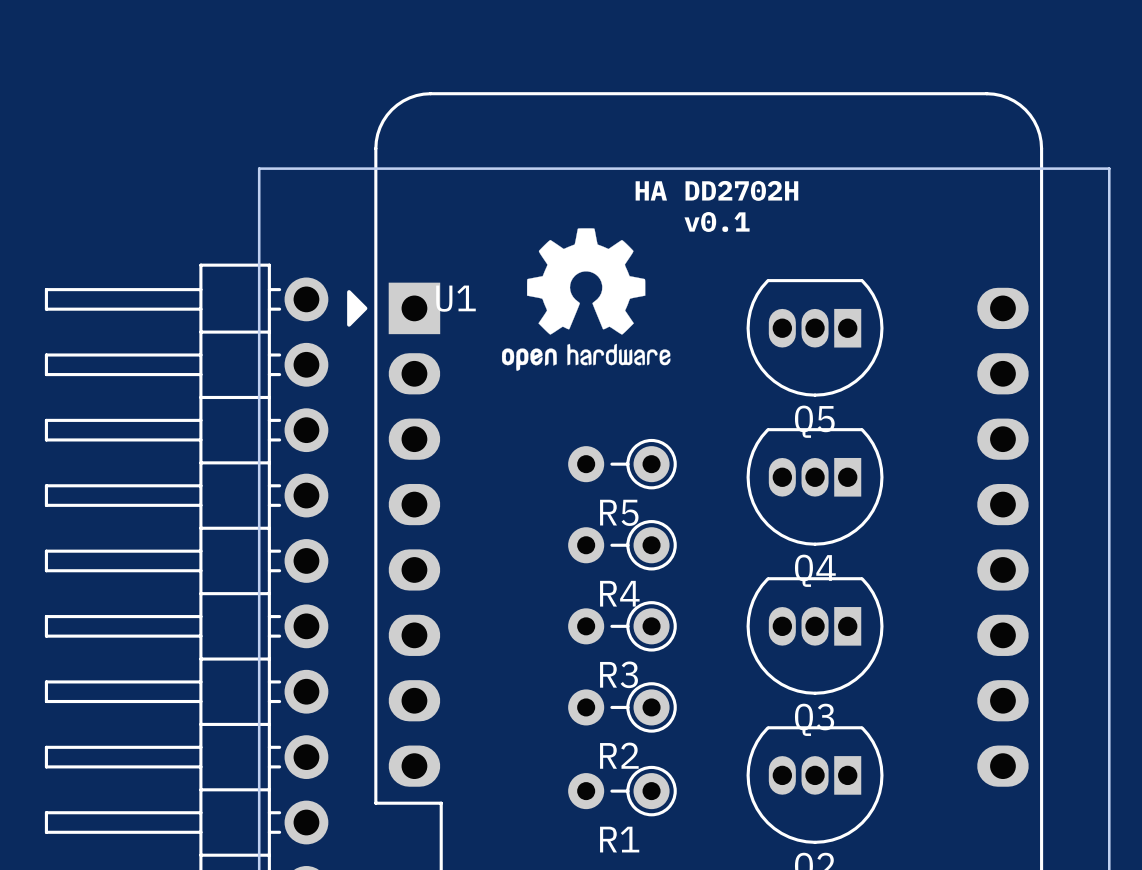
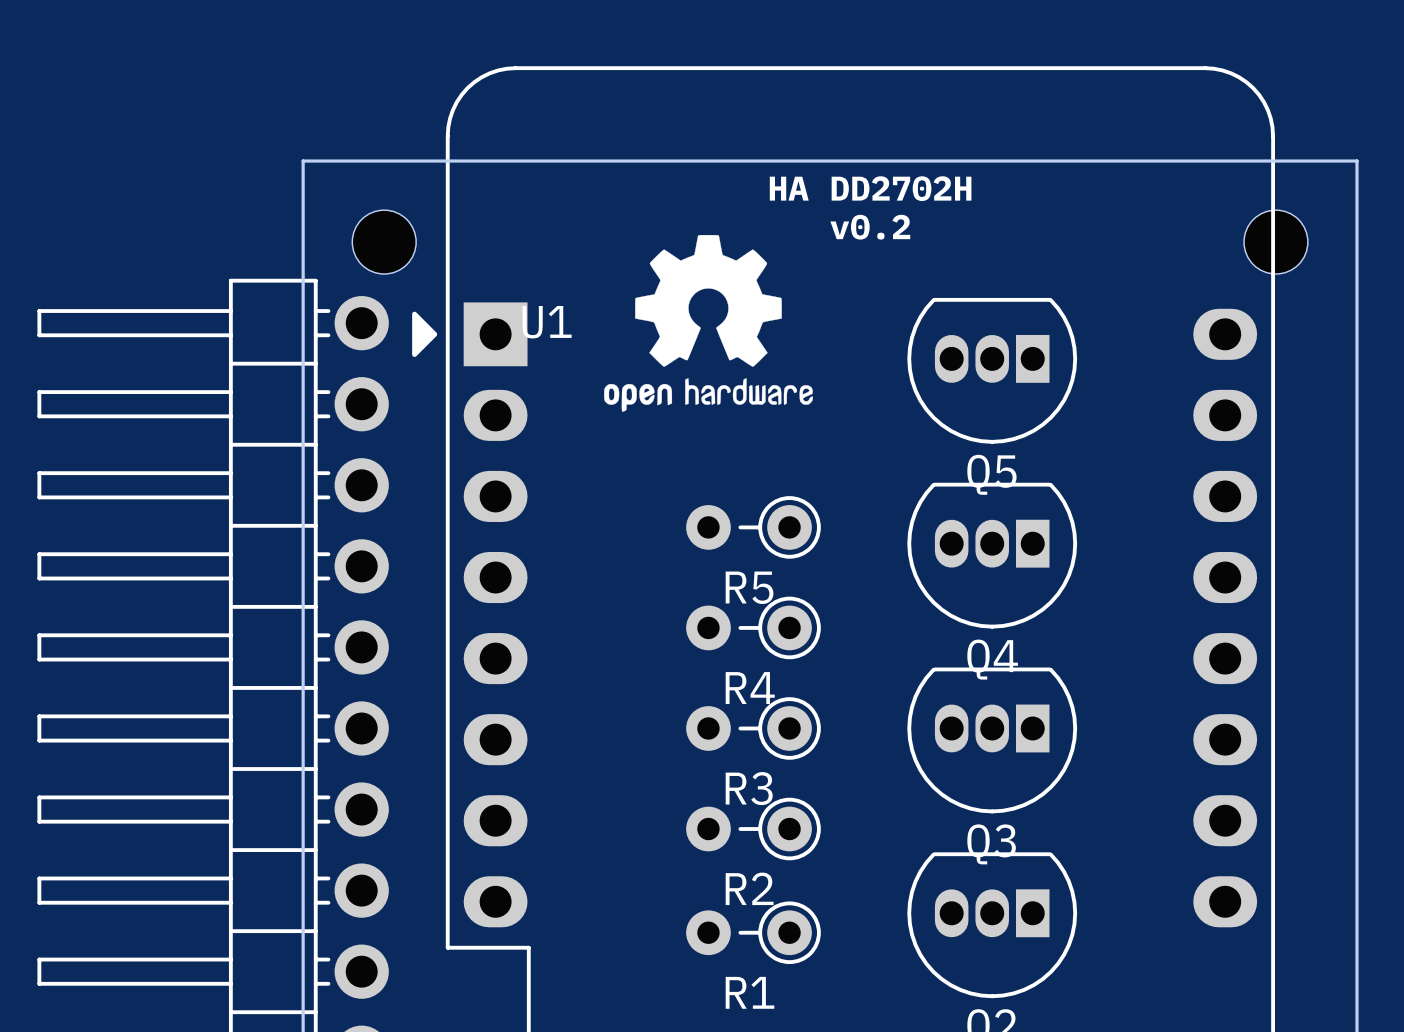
text: v0.1 (717, 221) -> v0.2 (870, 227)
part: none -> (384, 242)
part: none -> (1275, 242)

